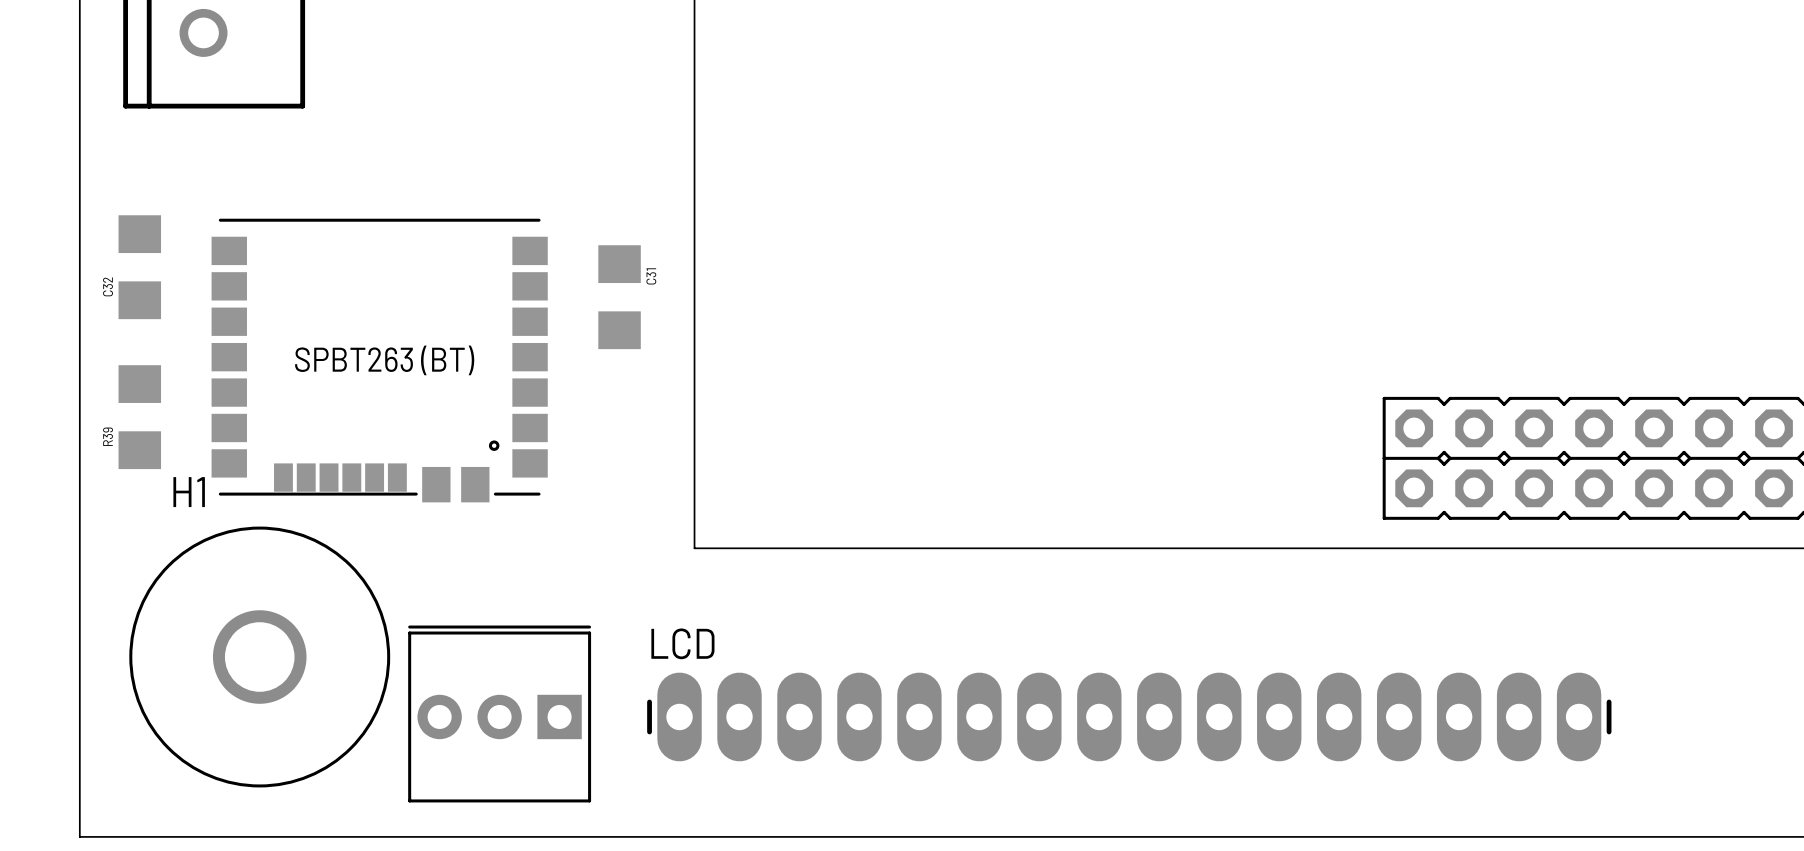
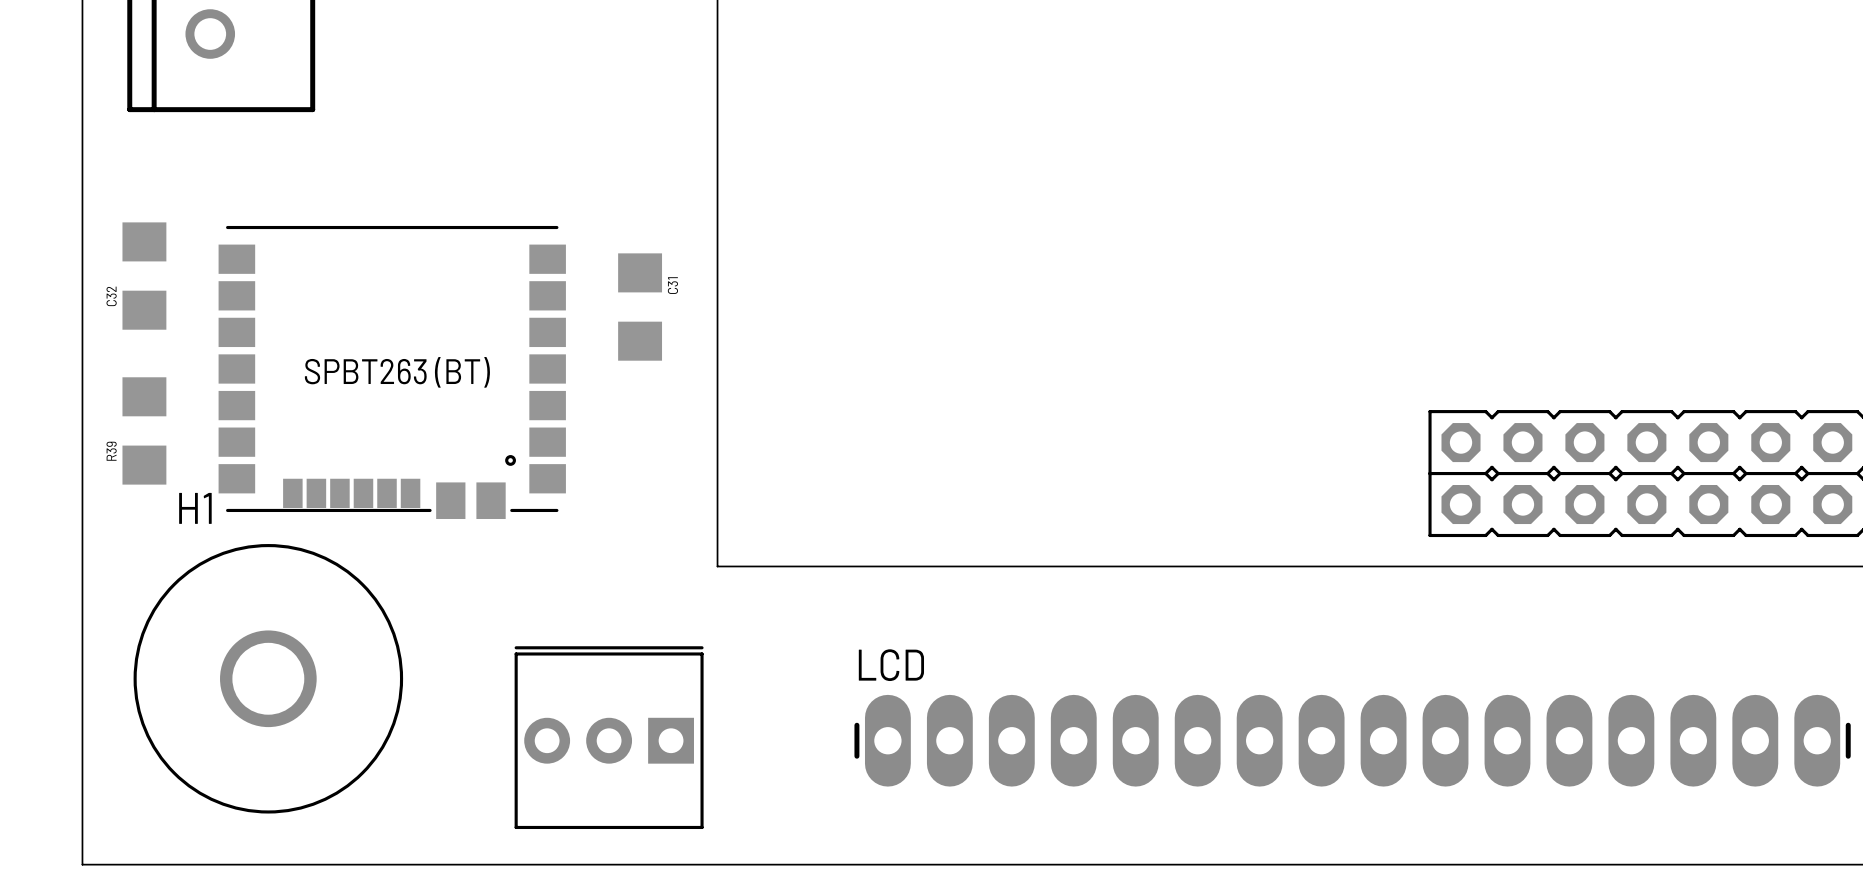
part position: (499, 713) -> (609, 737)
LCD position: (1129, 716) -> (1352, 740)

